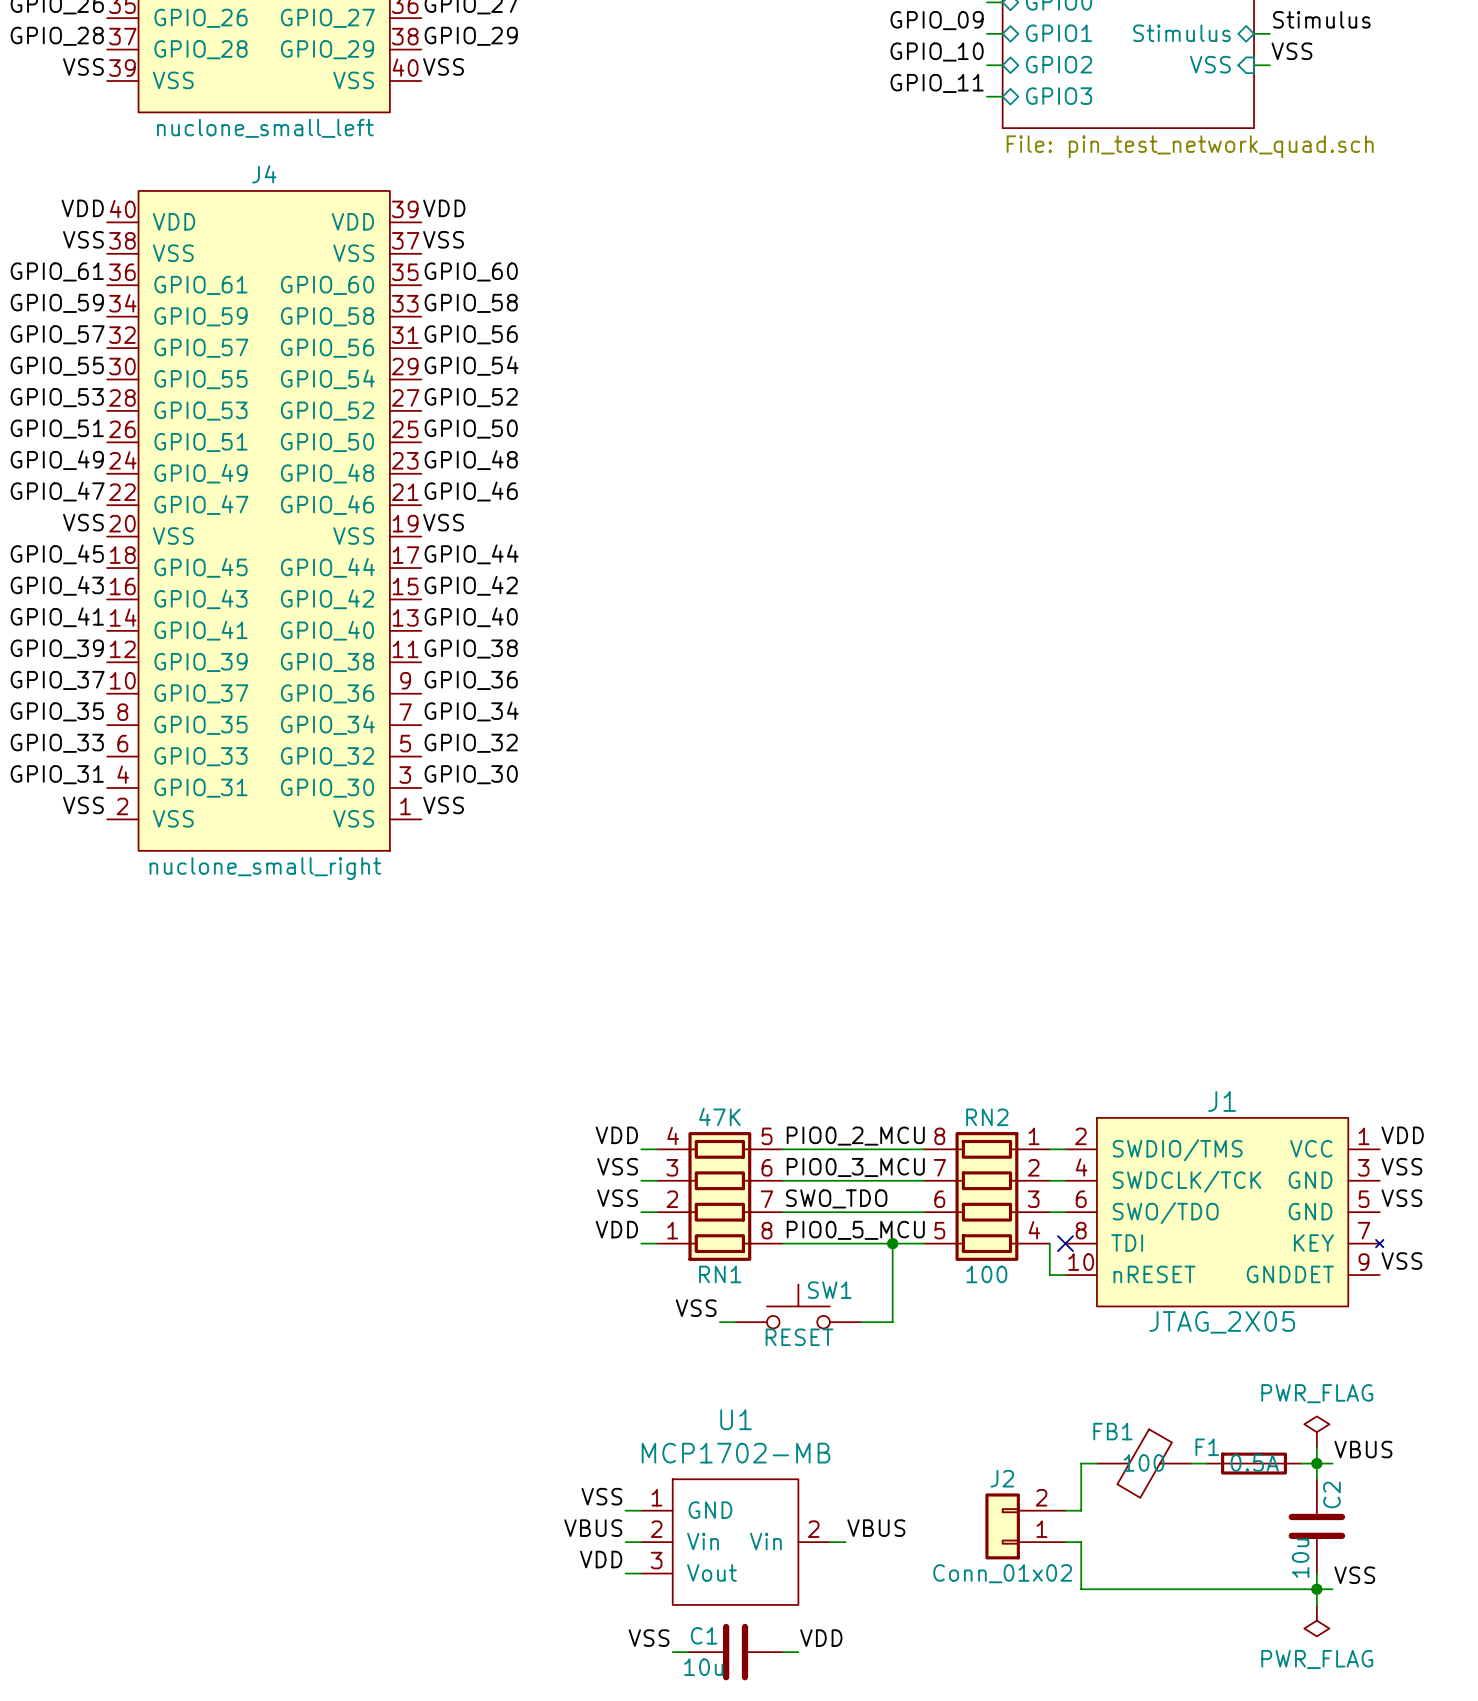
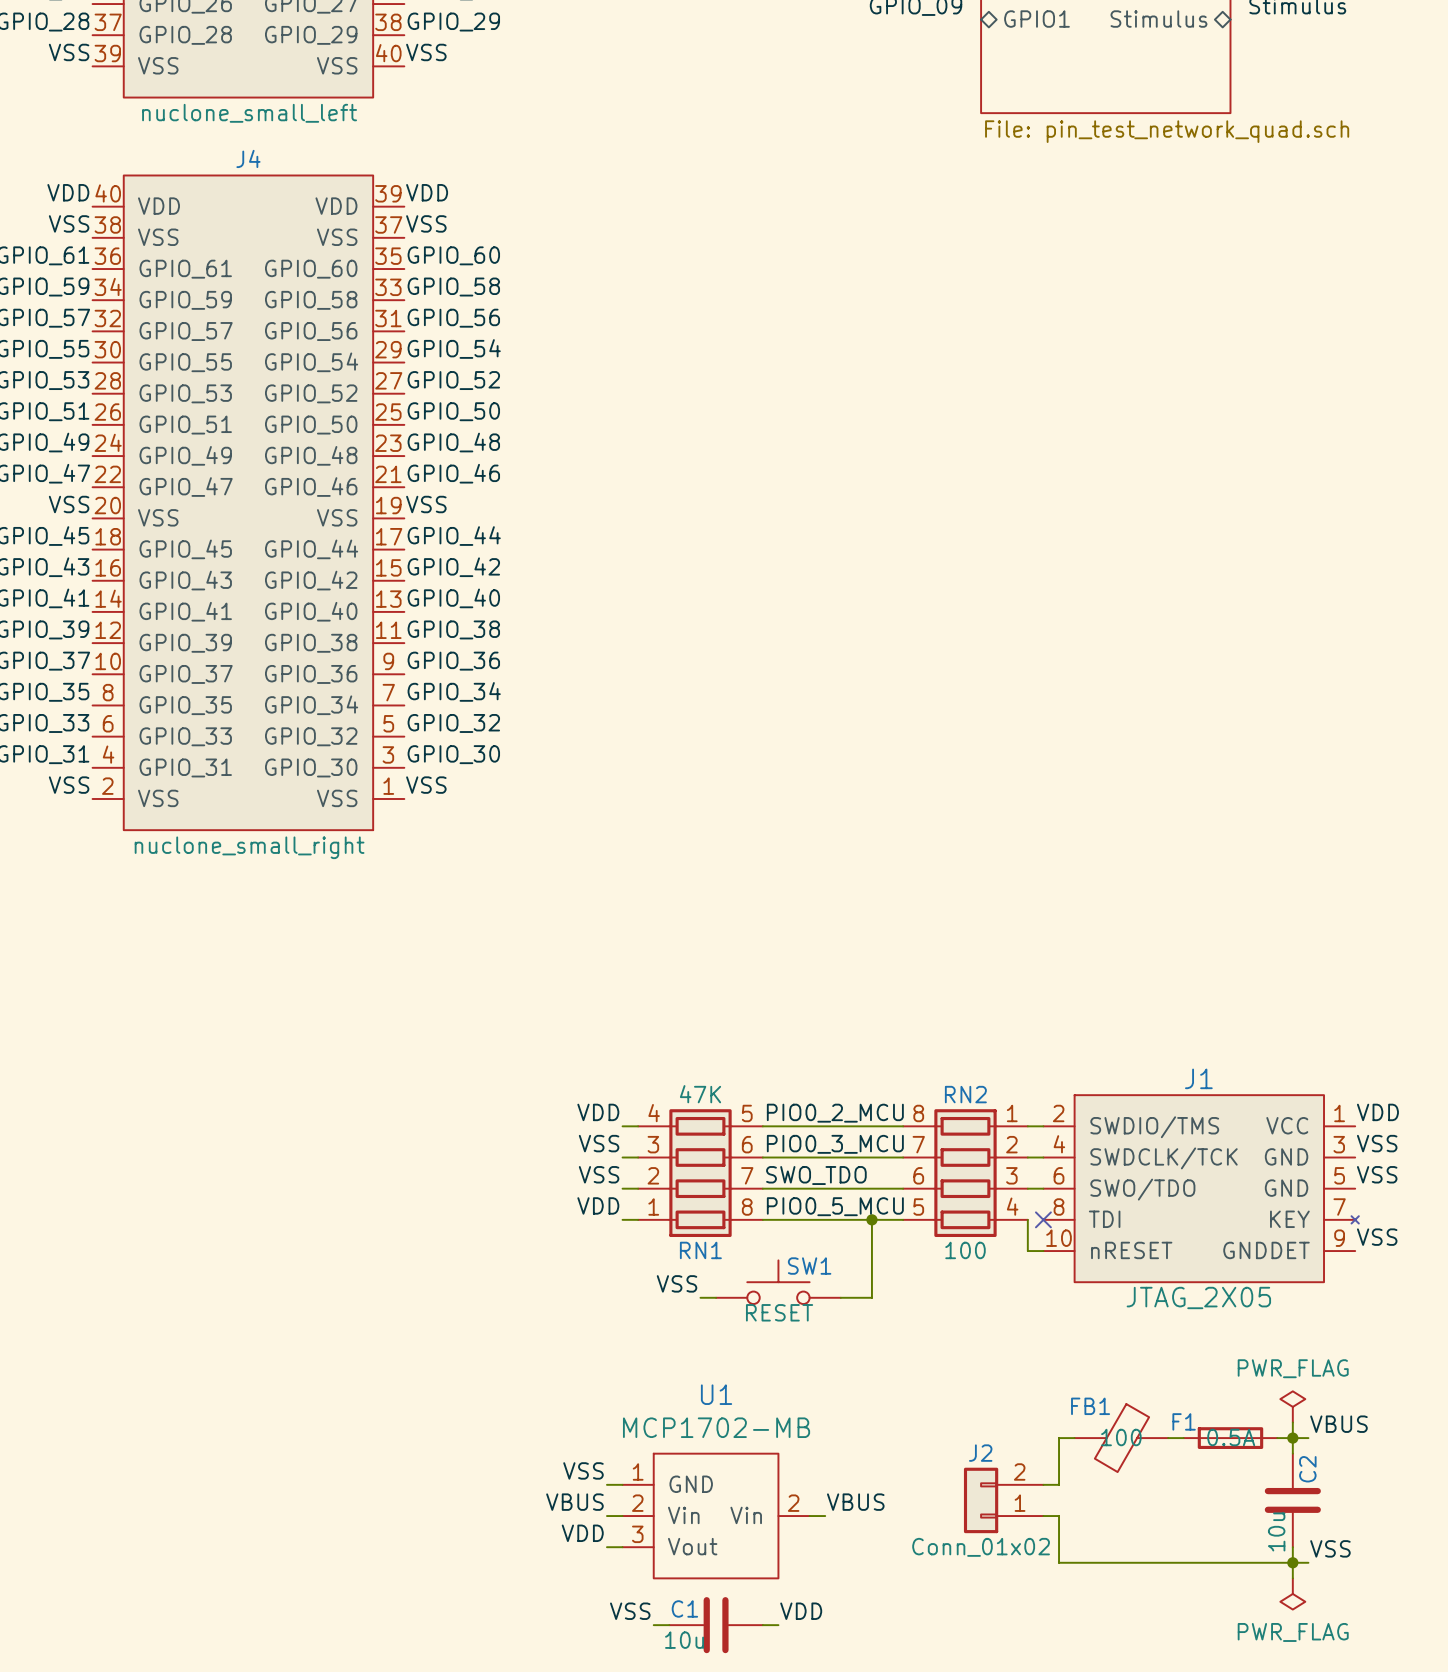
wire: (986, 33) (1002, 33) -> none
wire: (1254, 33) (1269, 33) -> none
label: VSS (1291, 51) -> none
label: GPIO_10 (937, 52) -> none
sheet pin: GPIO2 (1059, 64) -> none
sheet pin: VSS (1210, 64) -> none
wire: (986, 65) (1002, 65) -> none
wire: (1254, 65) (1269, 65) -> none
label: GPIO_11 (937, 83) -> none
wire: (986, 96) (1002, 96) -> none
sheet pin: GPIO3 (1059, 96) -> none

